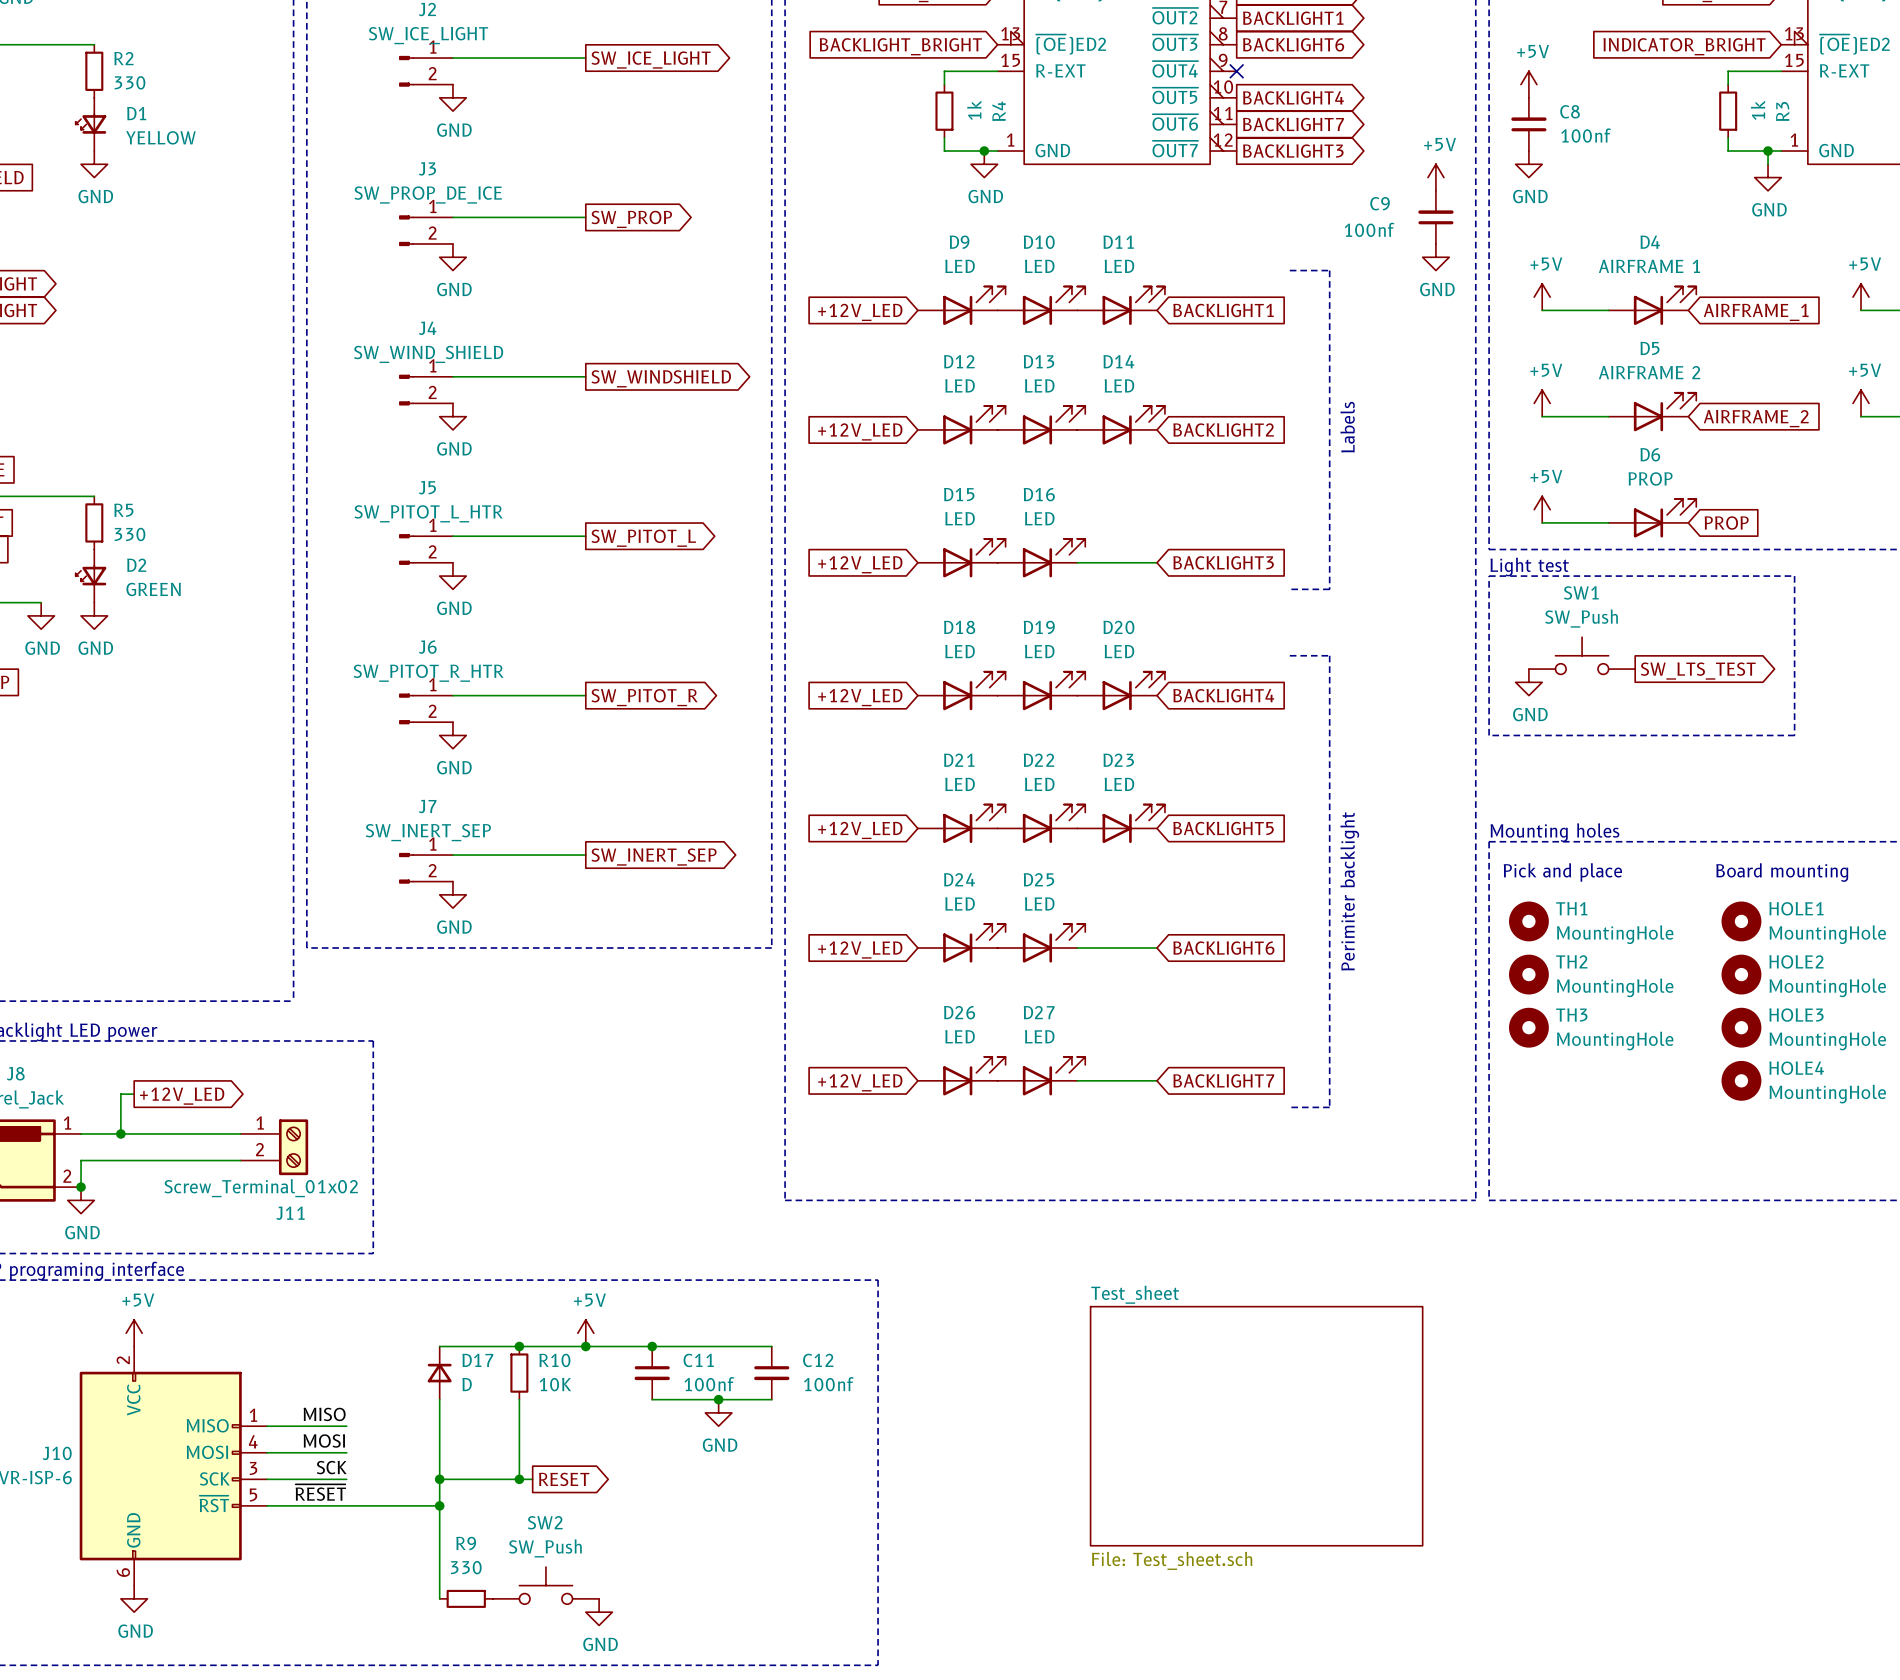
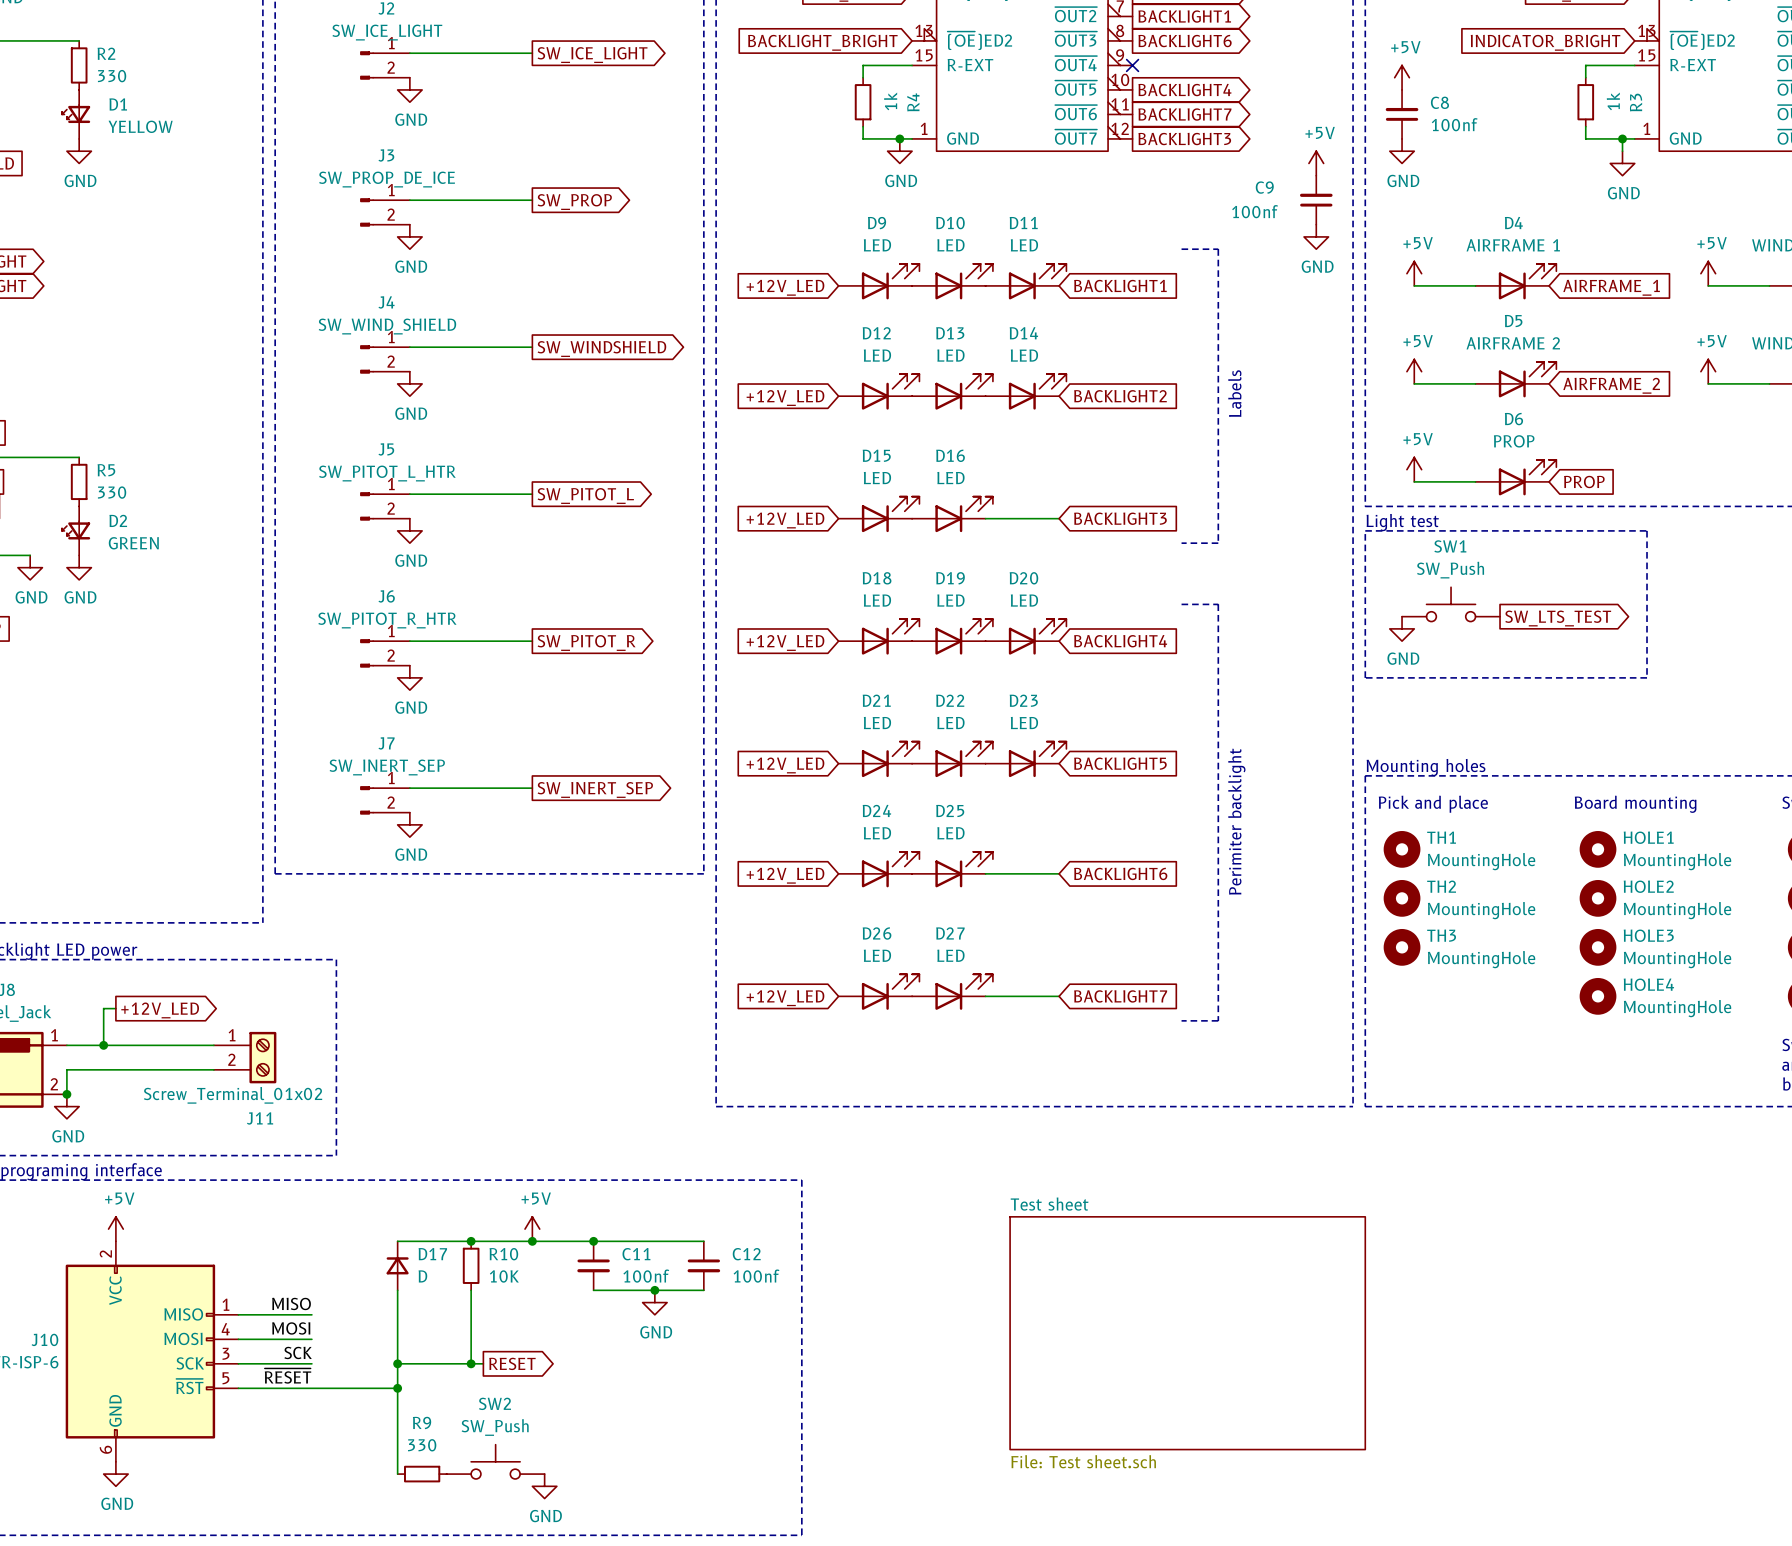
sheet Test_sheet: File: Test_sheet.sch (1256, 1426) -> none
sheet Test sheet: none -> File: Test sheet.sch (1187, 1333)

